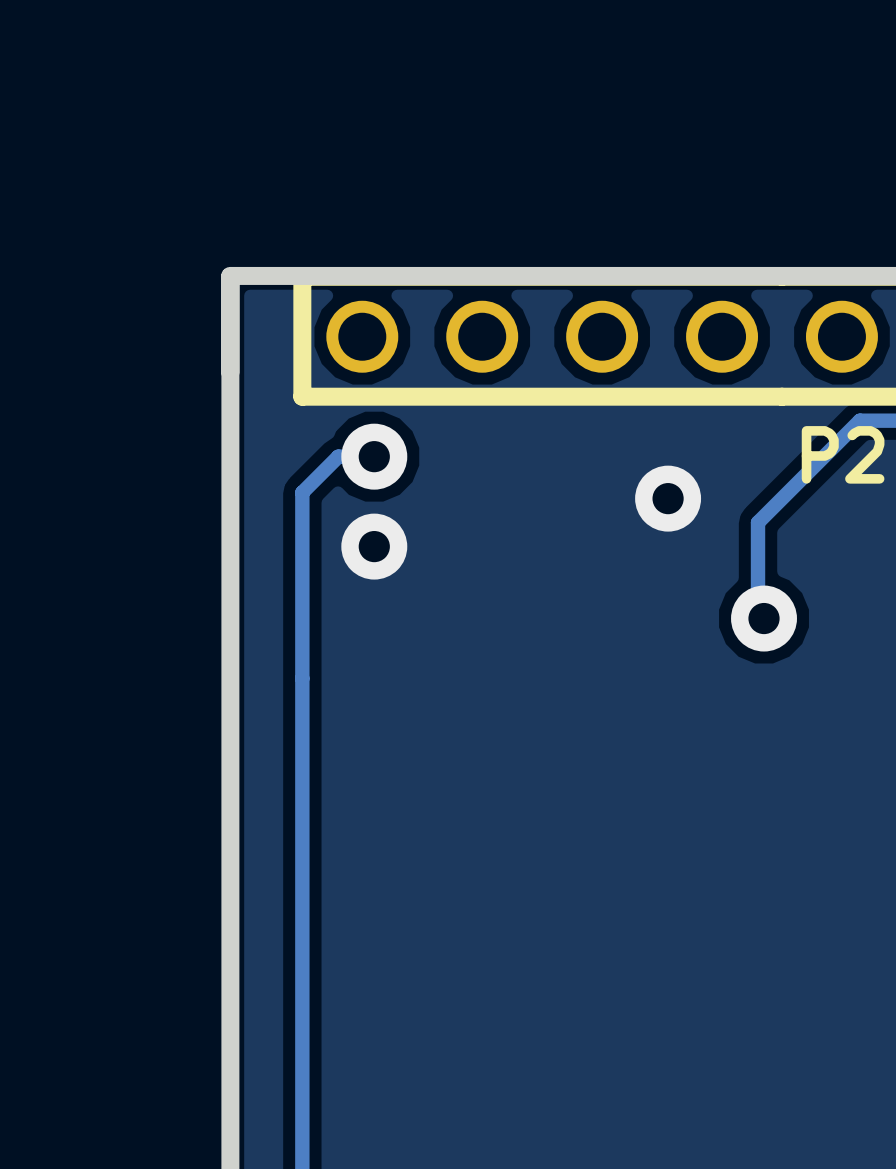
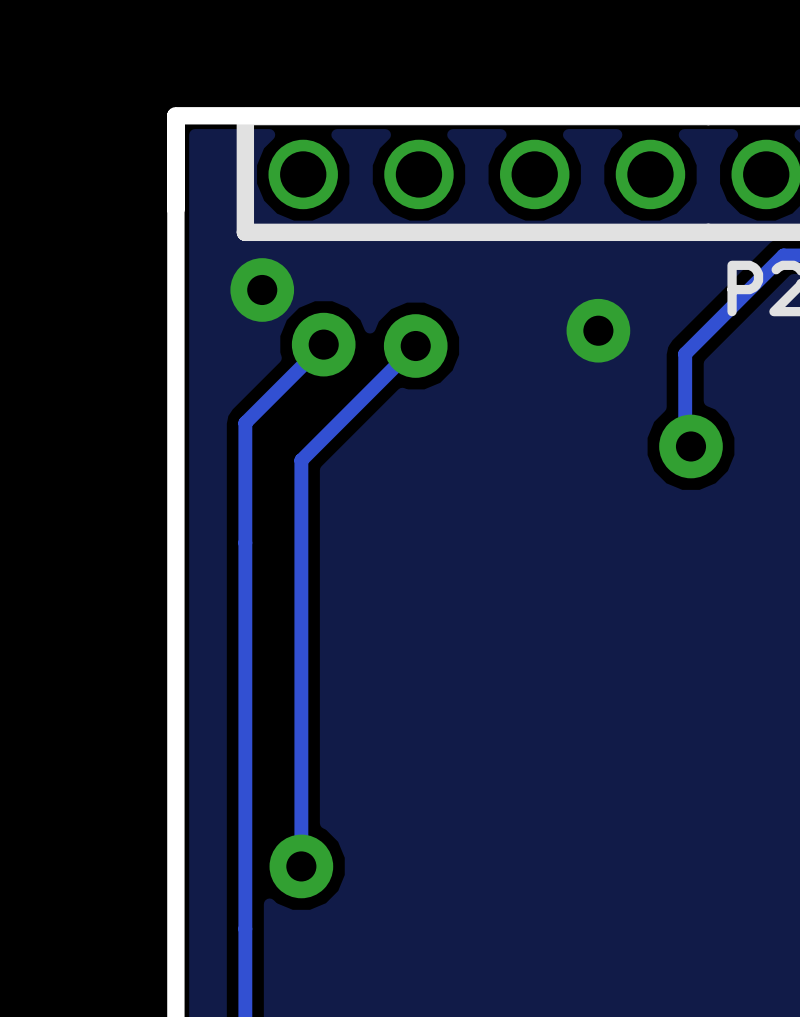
via: none -> (262, 289)
track: (374, 456) (338, 456) (302, 492) (302, 594) -> (323, 344) (245, 422)
via: (374, 456) -> none
via: none -> (323, 344)
track: none -> (415, 346) (301, 460) (301, 866)
via: none -> (415, 346)
via: (374, 546) -> none
via: none -> (301, 866)

